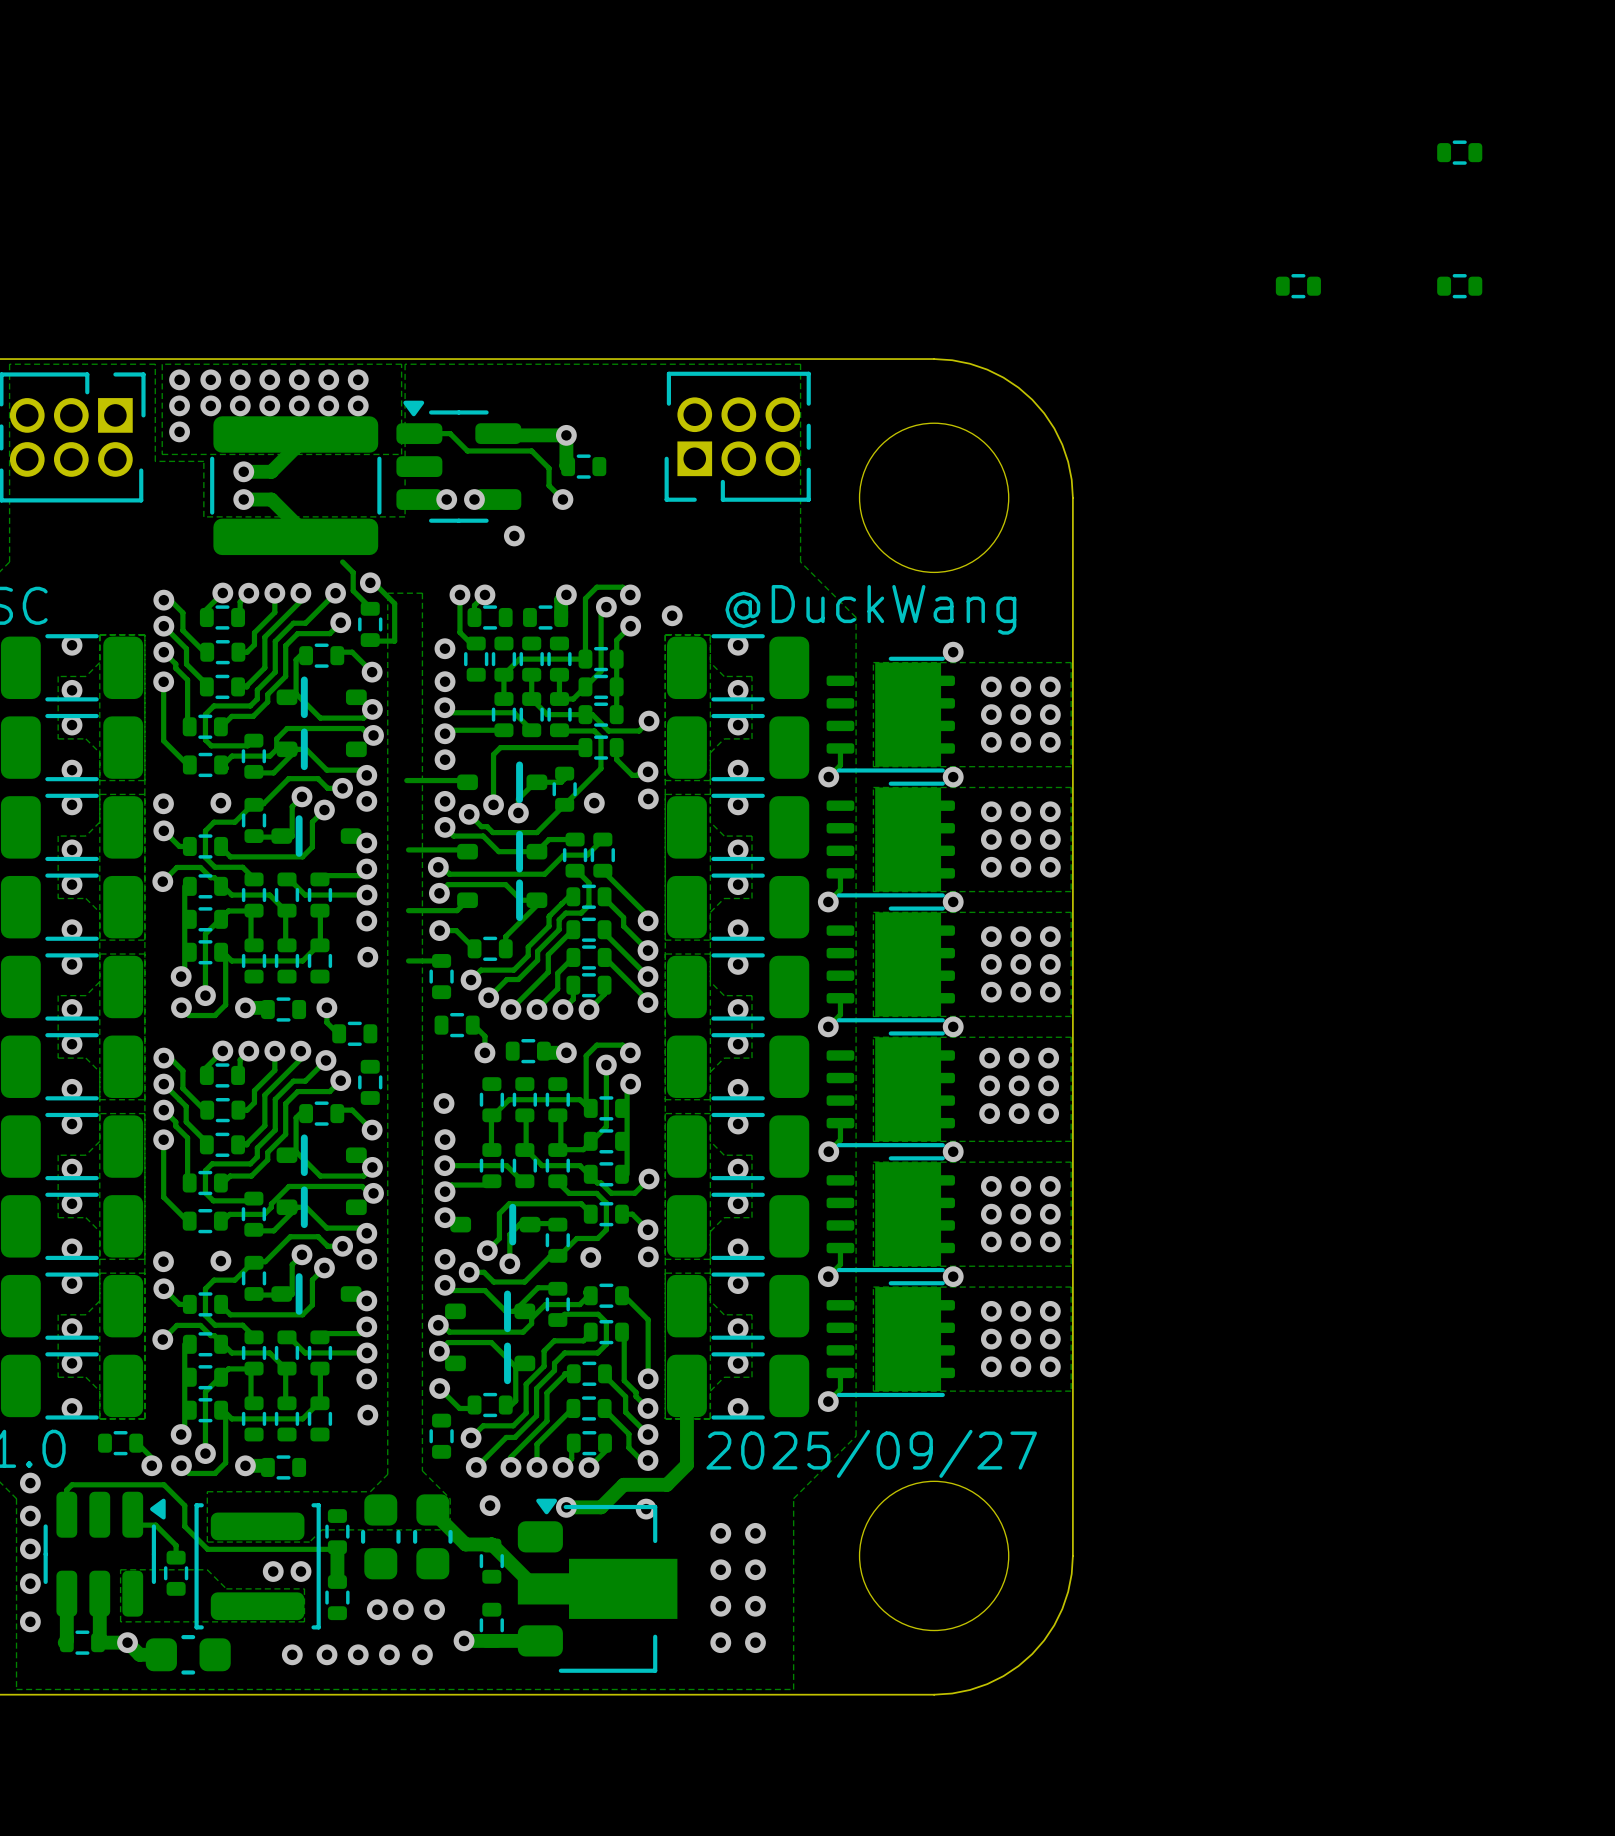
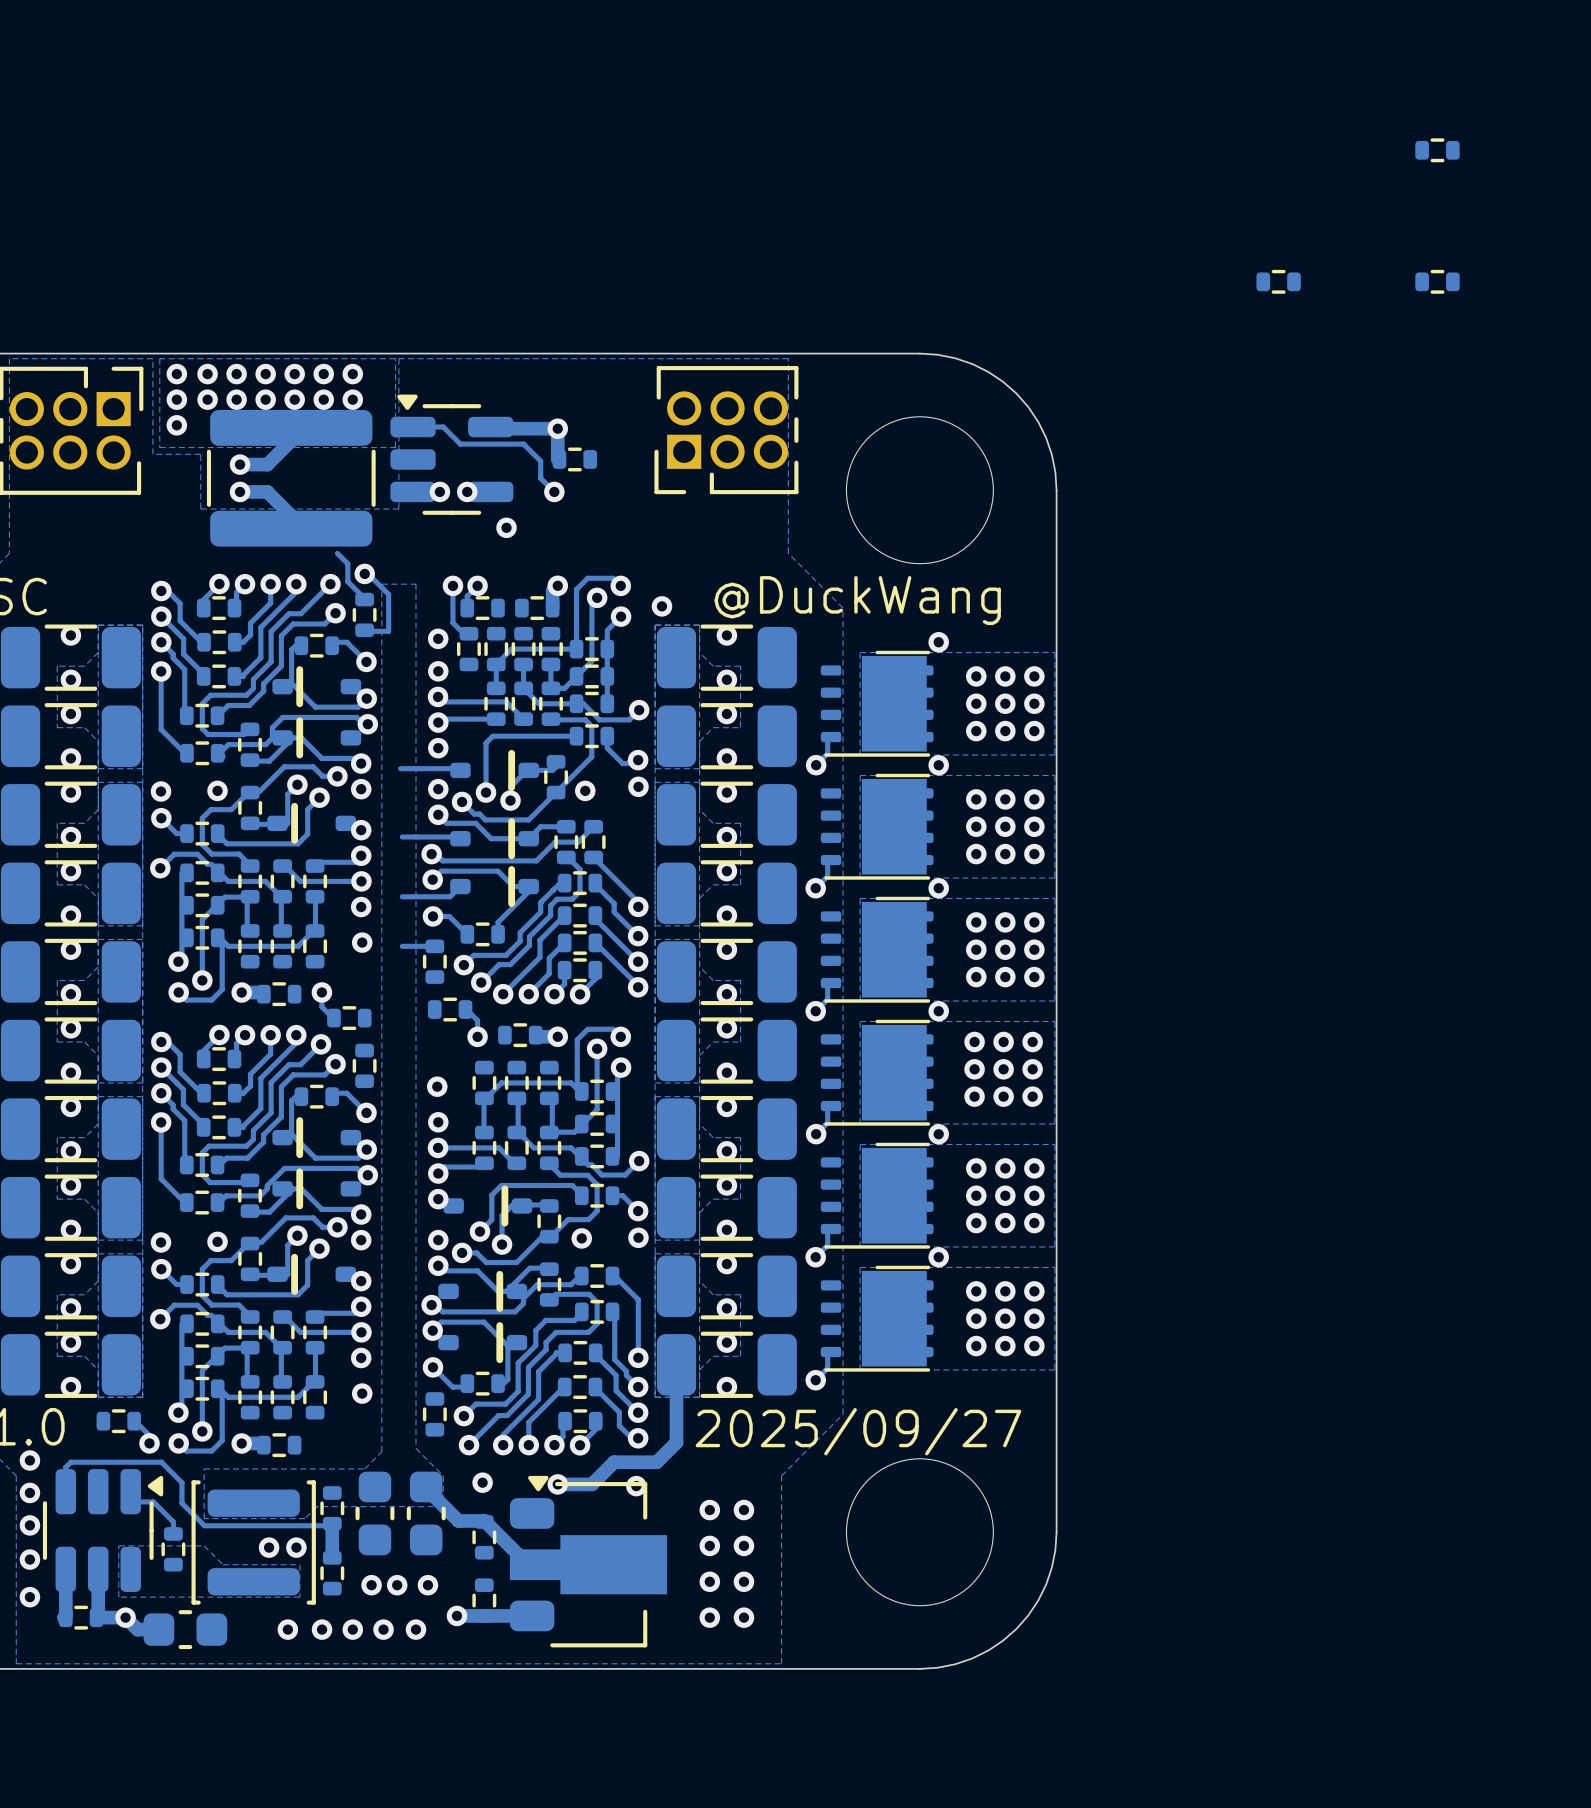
part footprint: [826, 656, 955, 773] -> [820, 650, 934, 757]
part footprint: [826, 781, 955, 898] -> [820, 773, 934, 880]
part footprint: [826, 906, 955, 1023] -> [820, 896, 934, 1003]
part footprint: [826, 1031, 955, 1148] -> [820, 1019, 934, 1126]
part footprint: [826, 1156, 955, 1273] -> [820, 1142, 934, 1249]
part footprint: [826, 1281, 955, 1398] -> [820, 1265, 934, 1372]

